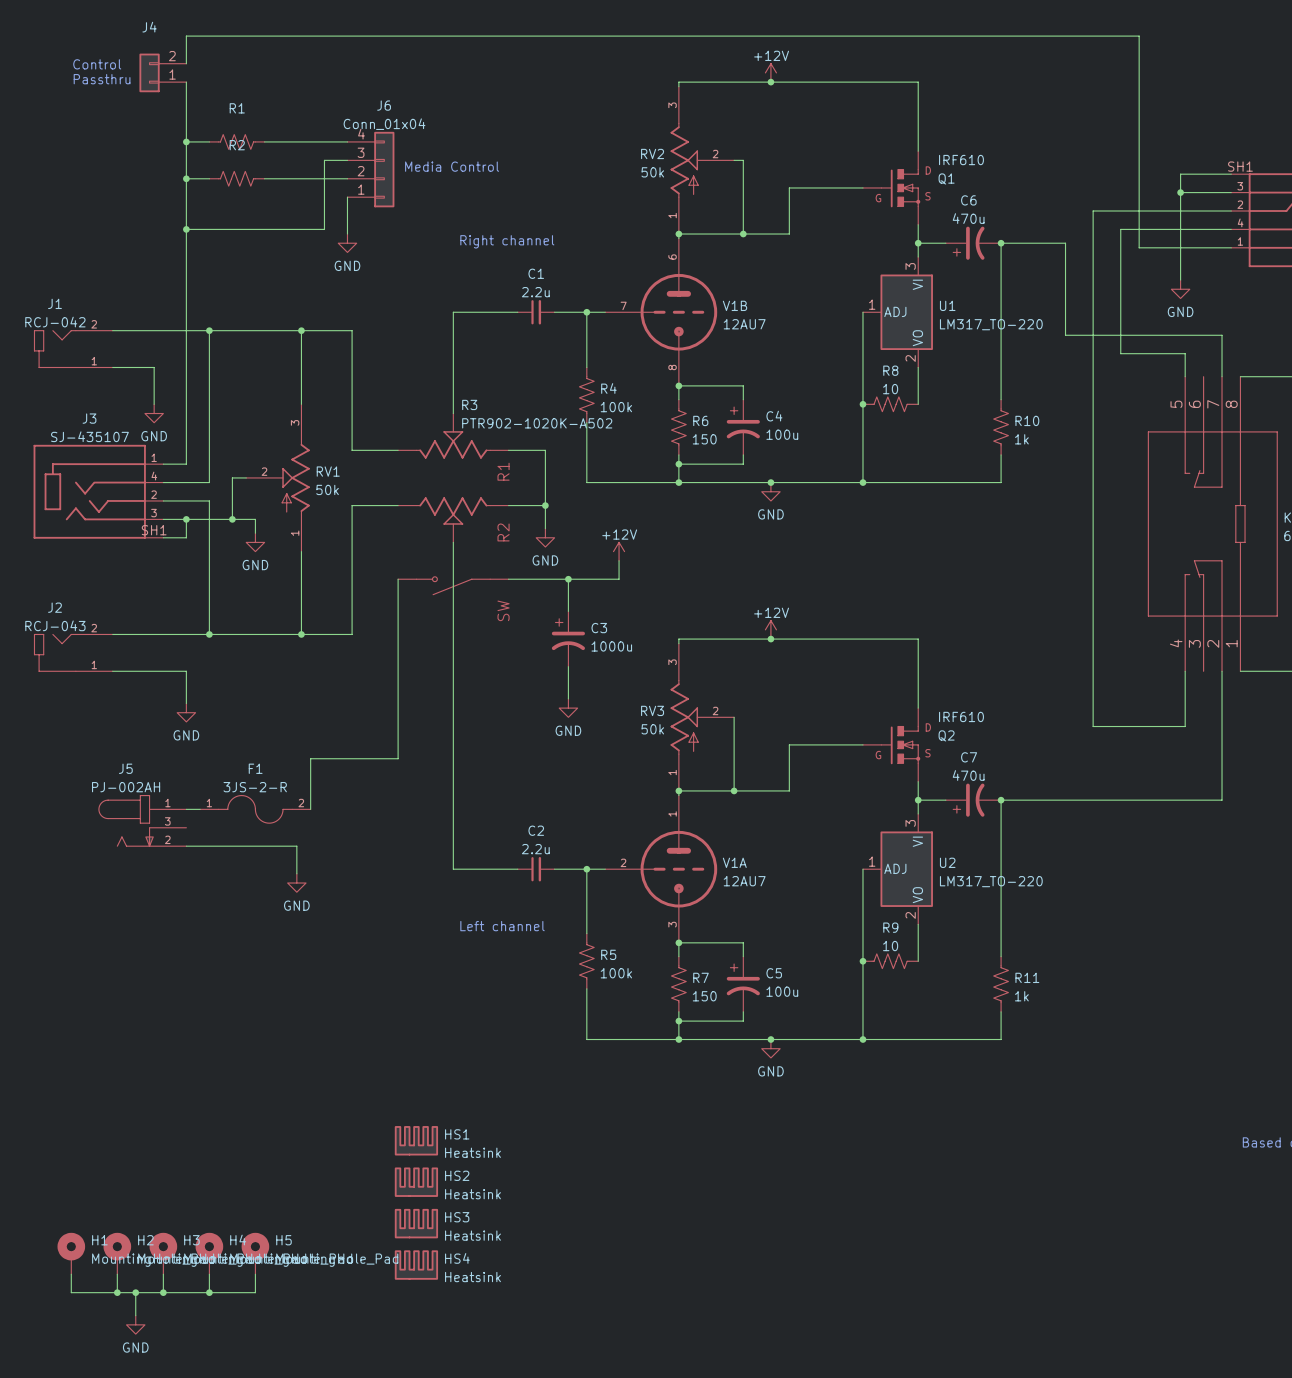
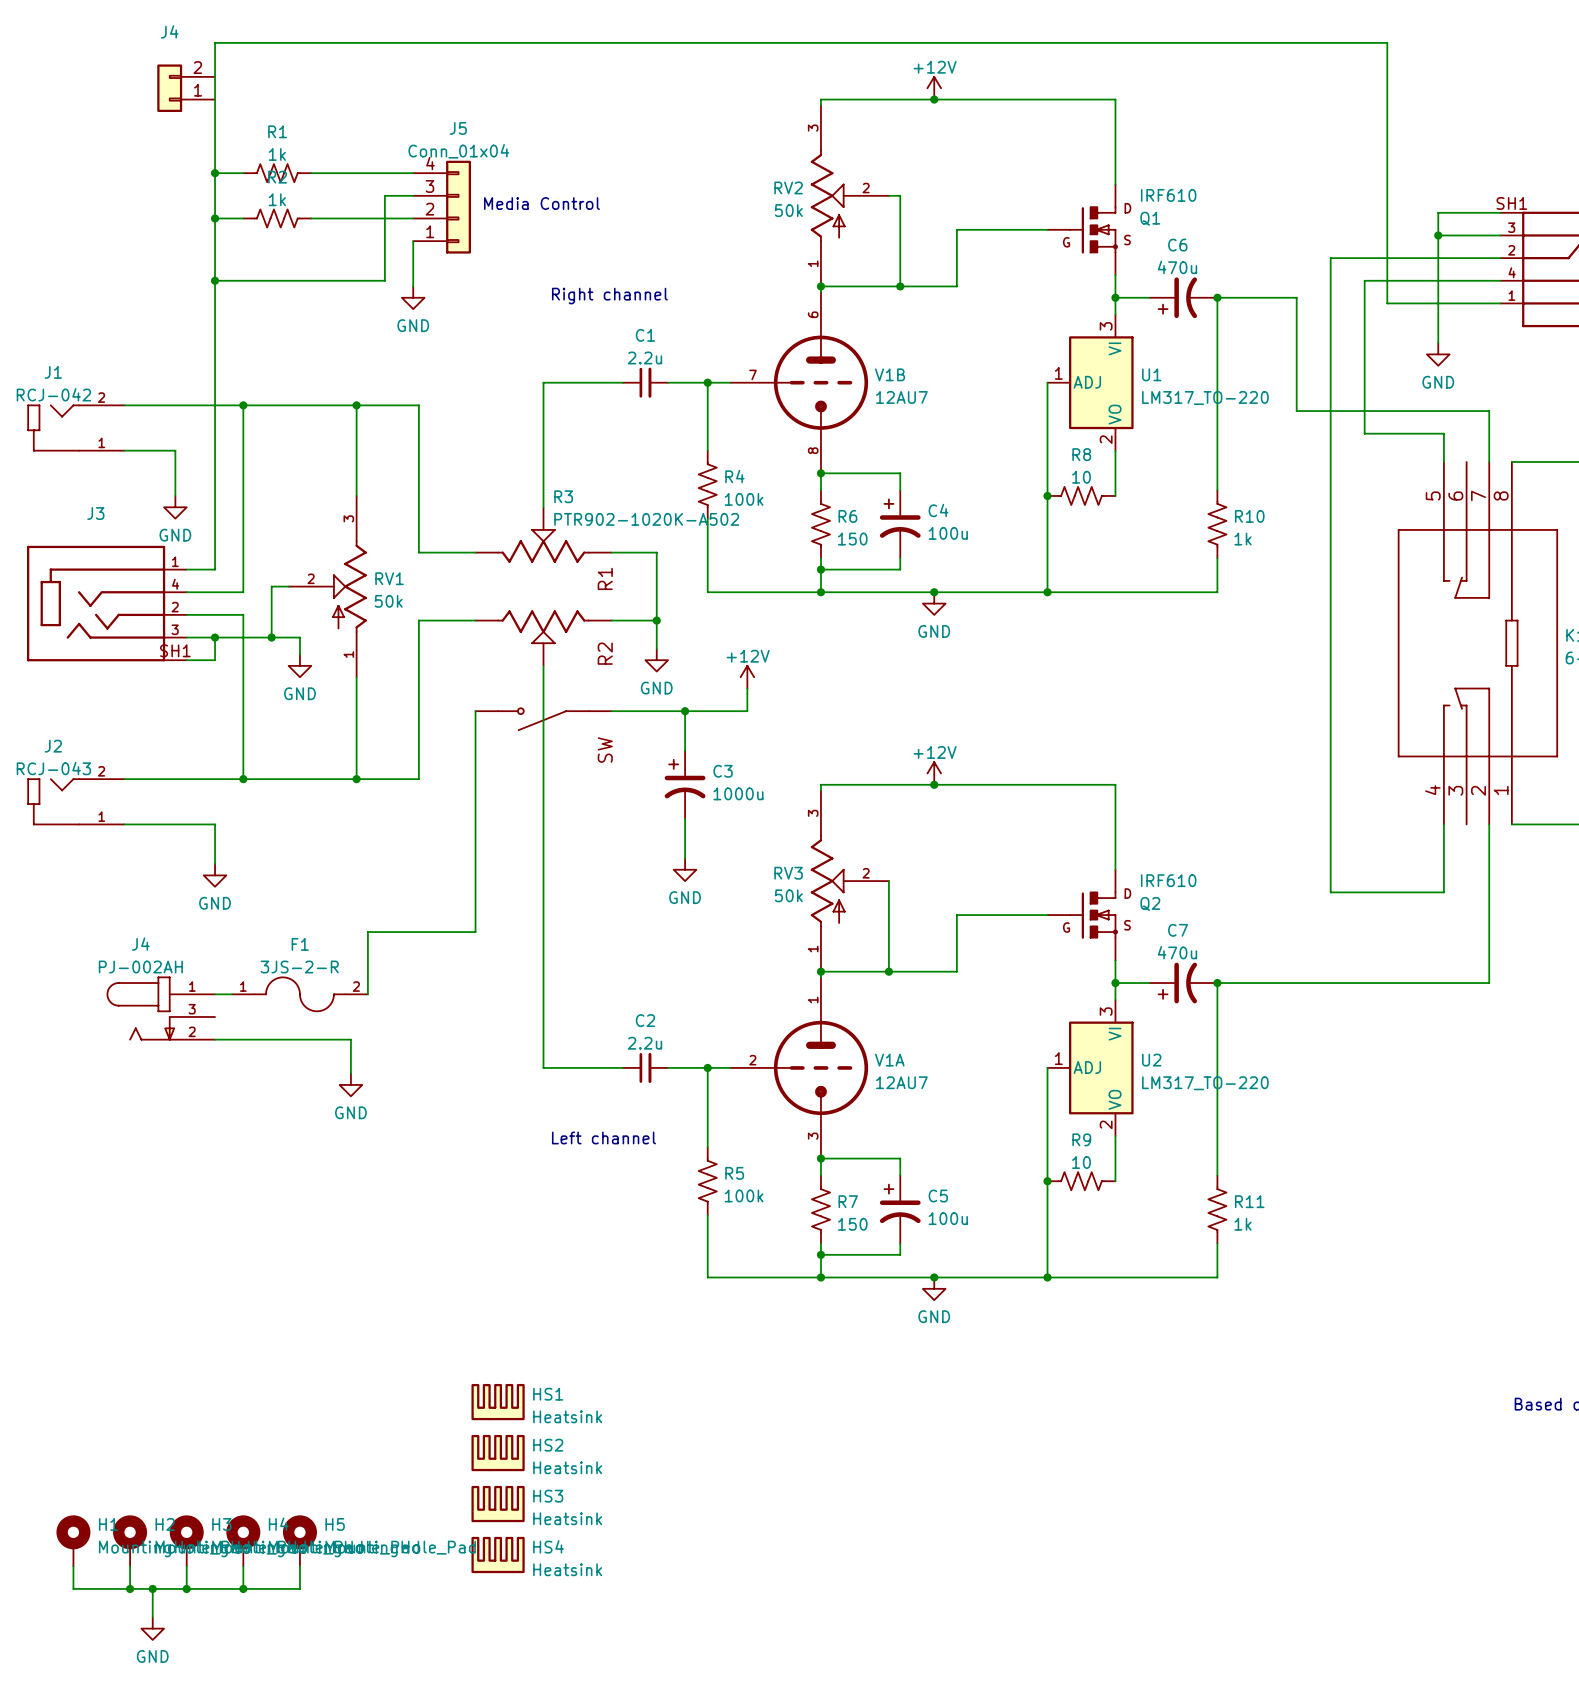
wire: none -> (215, 76) (215, 99)
text: Control (97, 64) -> none
text: Passthru (102, 79) -> none
J6 name: J6 (384, 105) -> J5 (458, 128)
R1 value: none -> 1k (277, 154)
R2 value: none -> 1k (277, 199)
J3 value: SJ-435107 (89, 436) -> none
J5 name: J5 (125, 768) -> J4 (140, 944)

